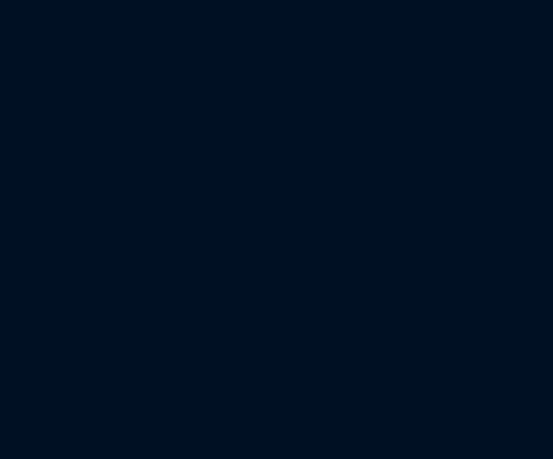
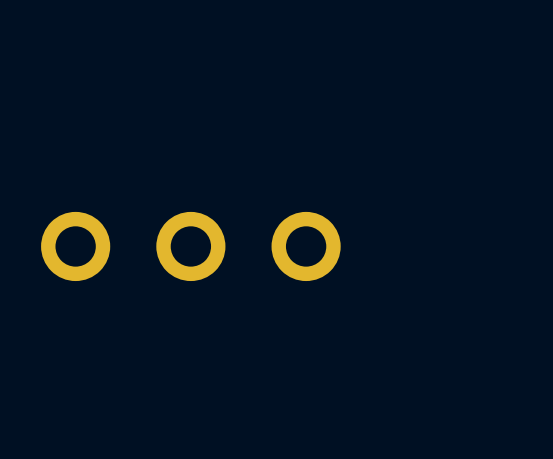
part: none -> (190, 246)

